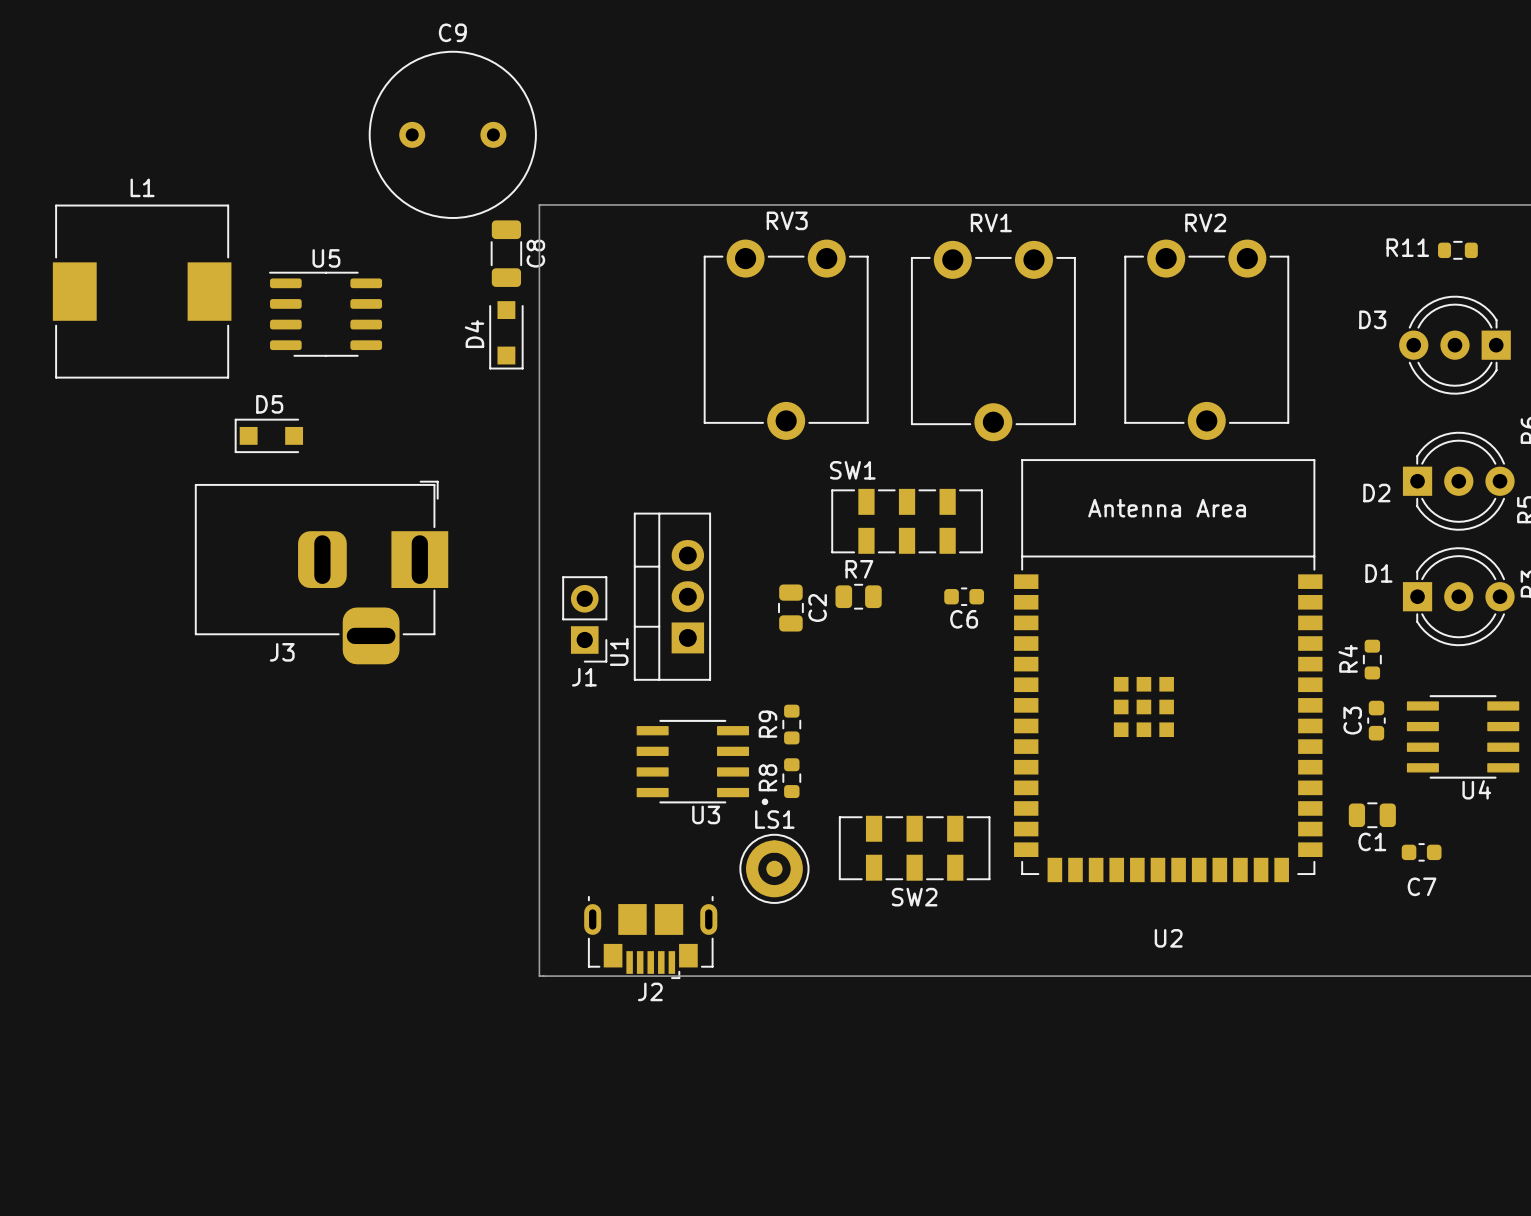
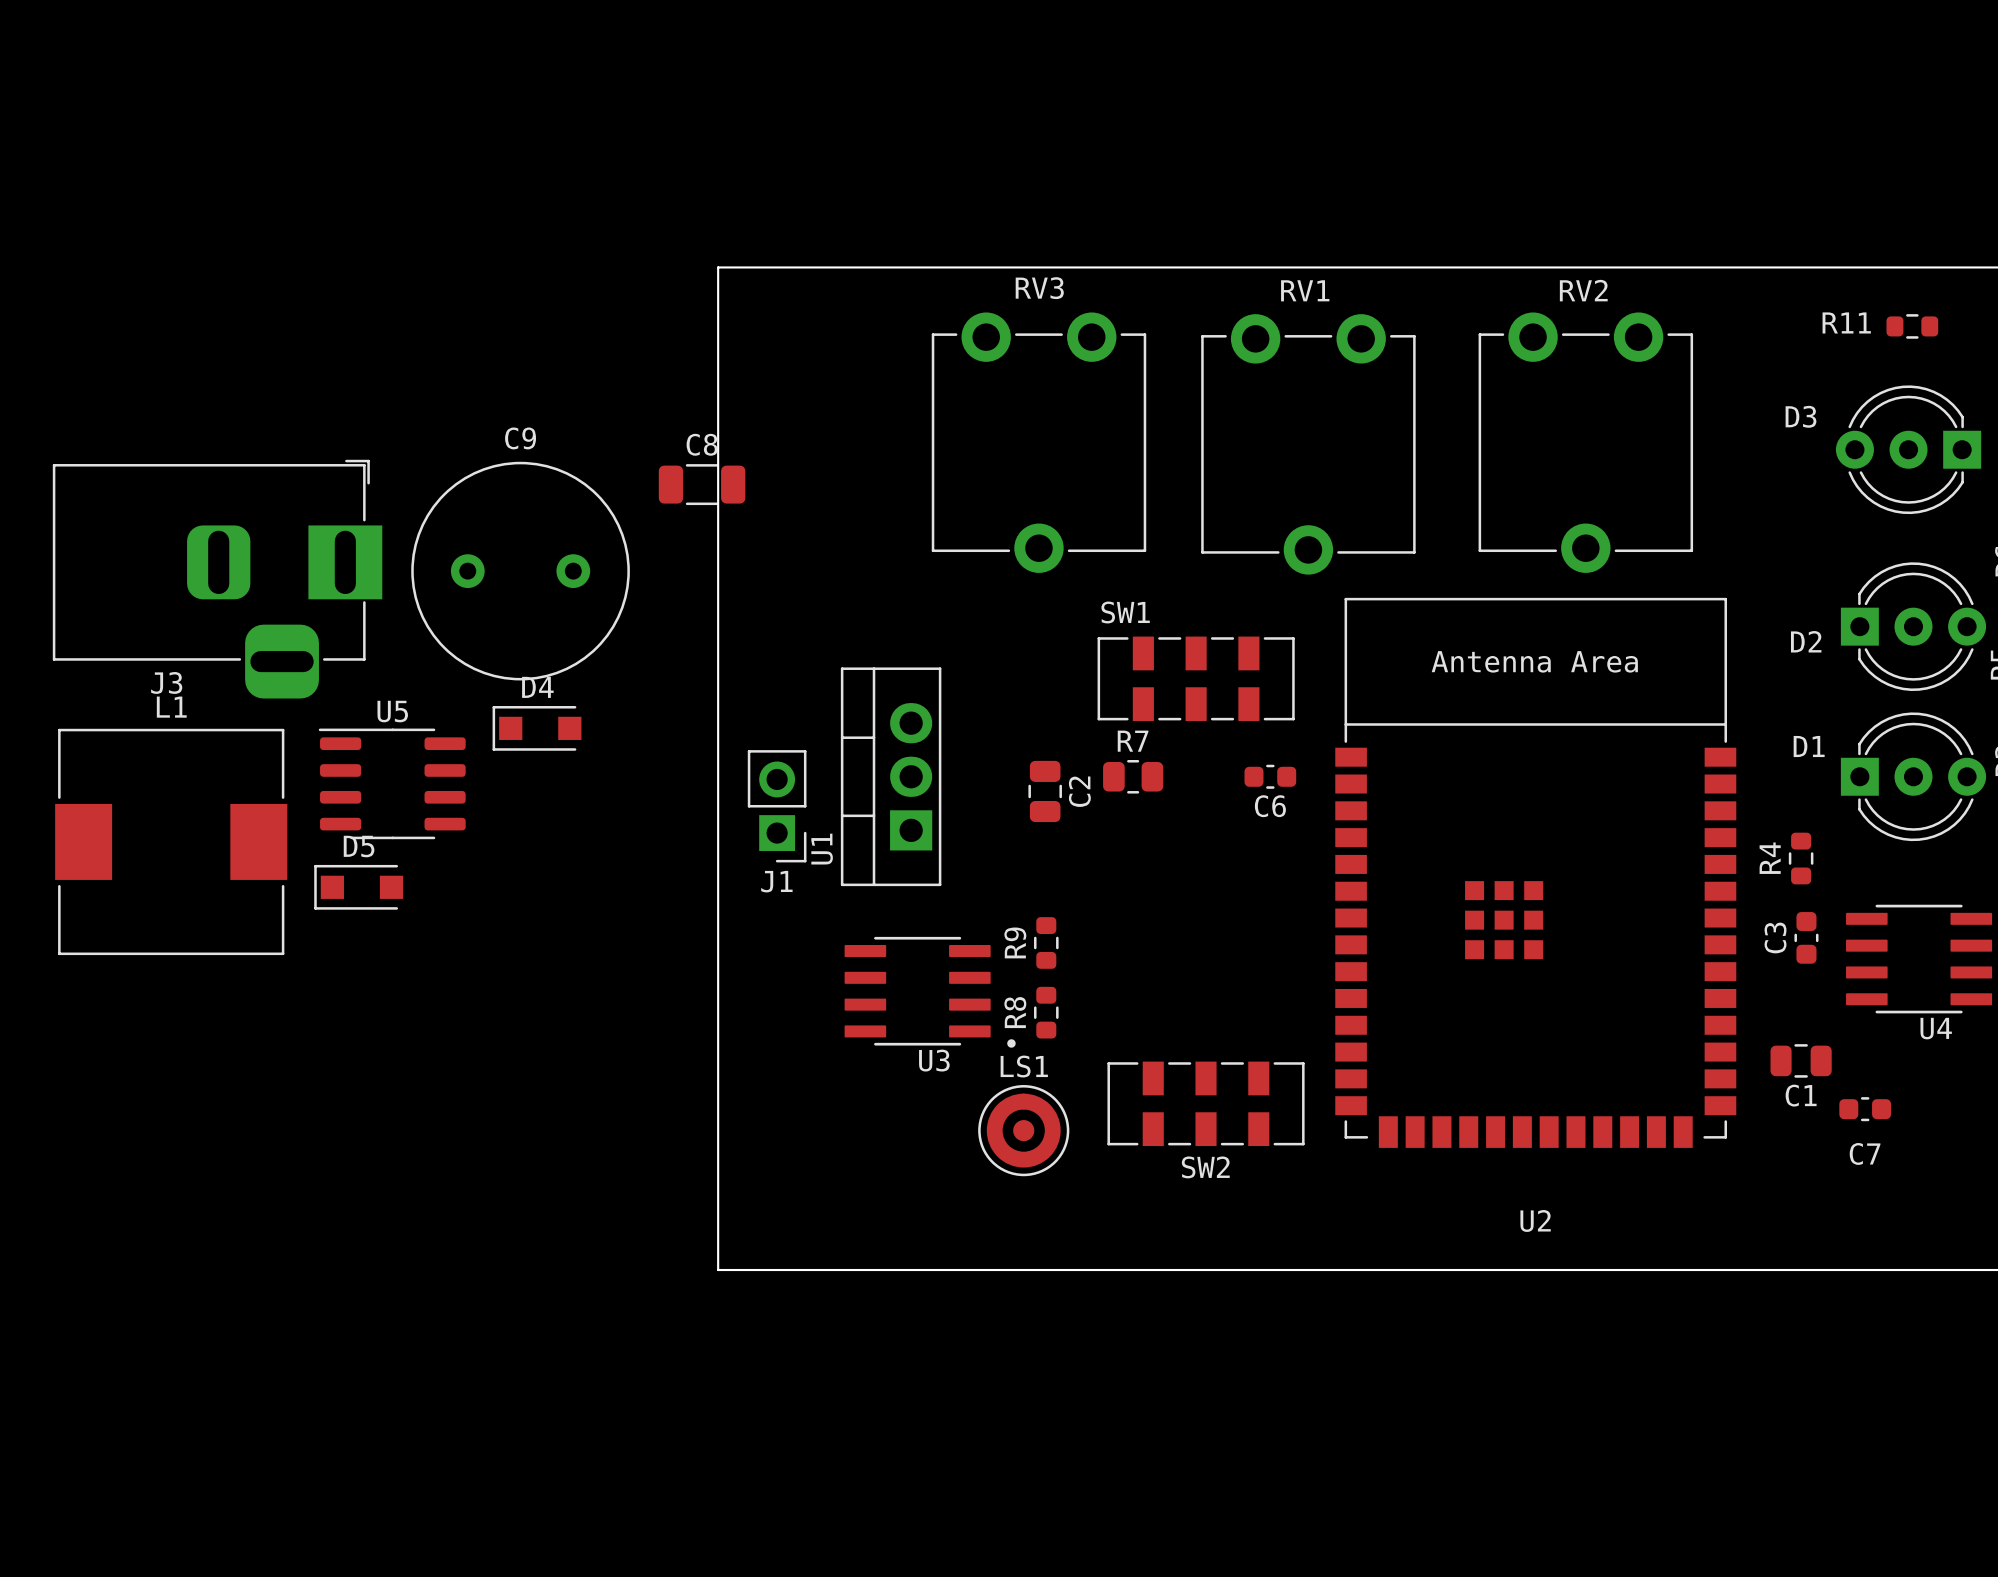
C9 position: (452, 134) -> (520, 571)
C8 rotation: 0° (506, 253) -> 90° clockwise (702, 484)
C8 position: (506, 253) -> (702, 484)
C8 name position: C8 (535, 253) -> C8 (702, 444)
L1 position: (142, 291) -> (171, 841)
U5 position: (325, 314) -> (392, 783)
D4 rotation: 0° (506, 335) -> 90° clockwise (537, 728)
D4 position: (506, 335) -> (537, 728)
D5 position: (268, 435) -> (358, 887)
J3 position: (321, 572) -> (217, 579)
J2: (650, 937) -> none

